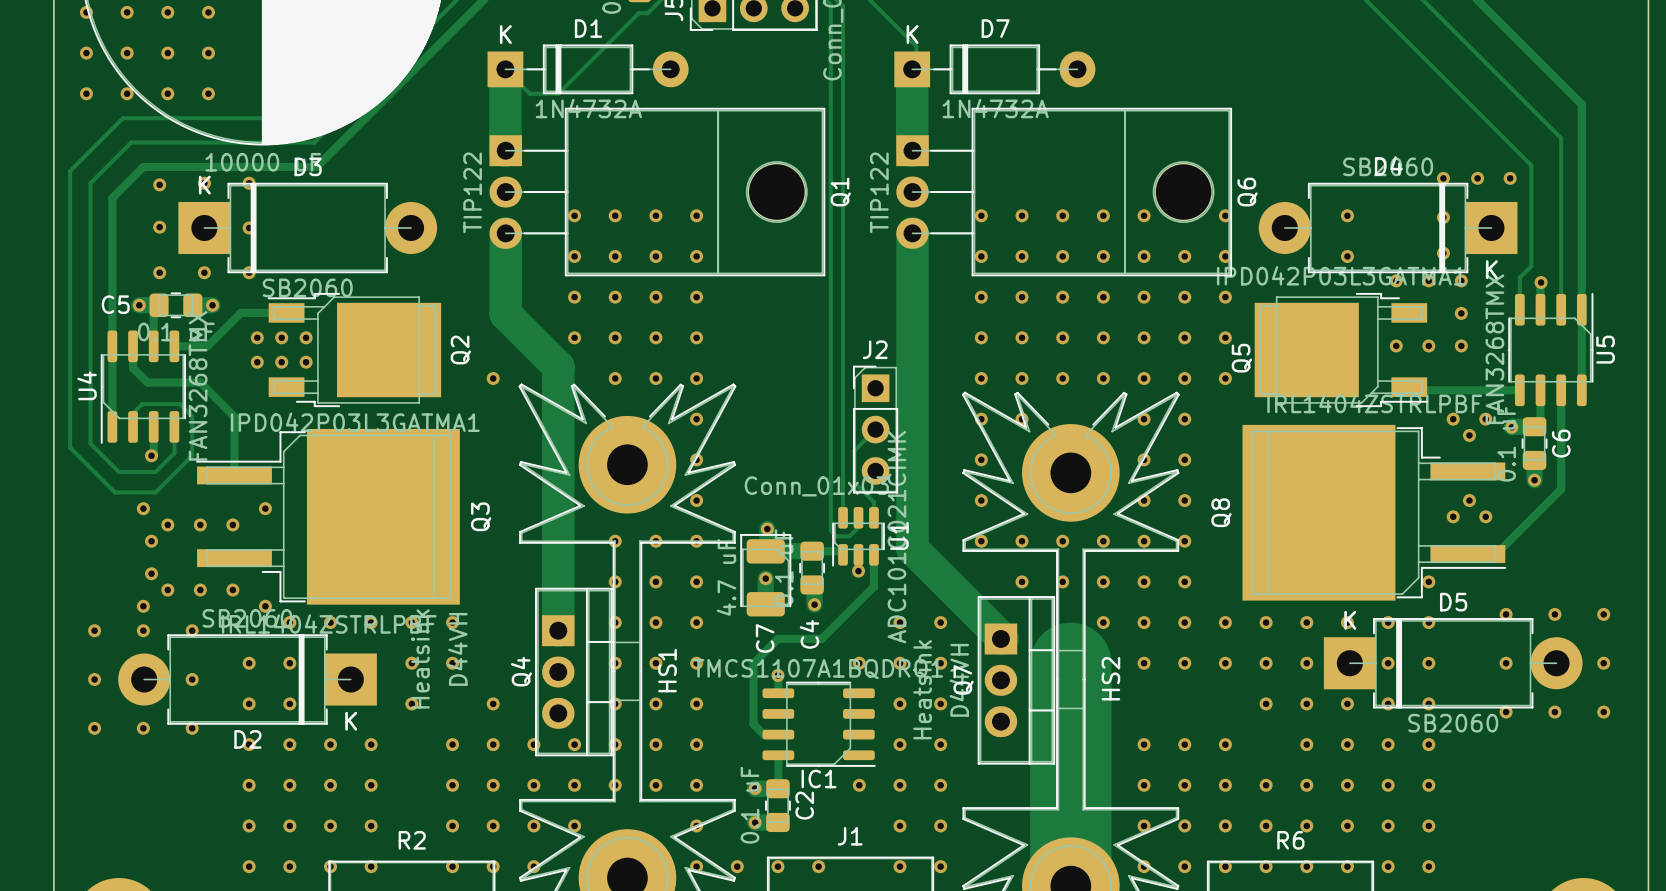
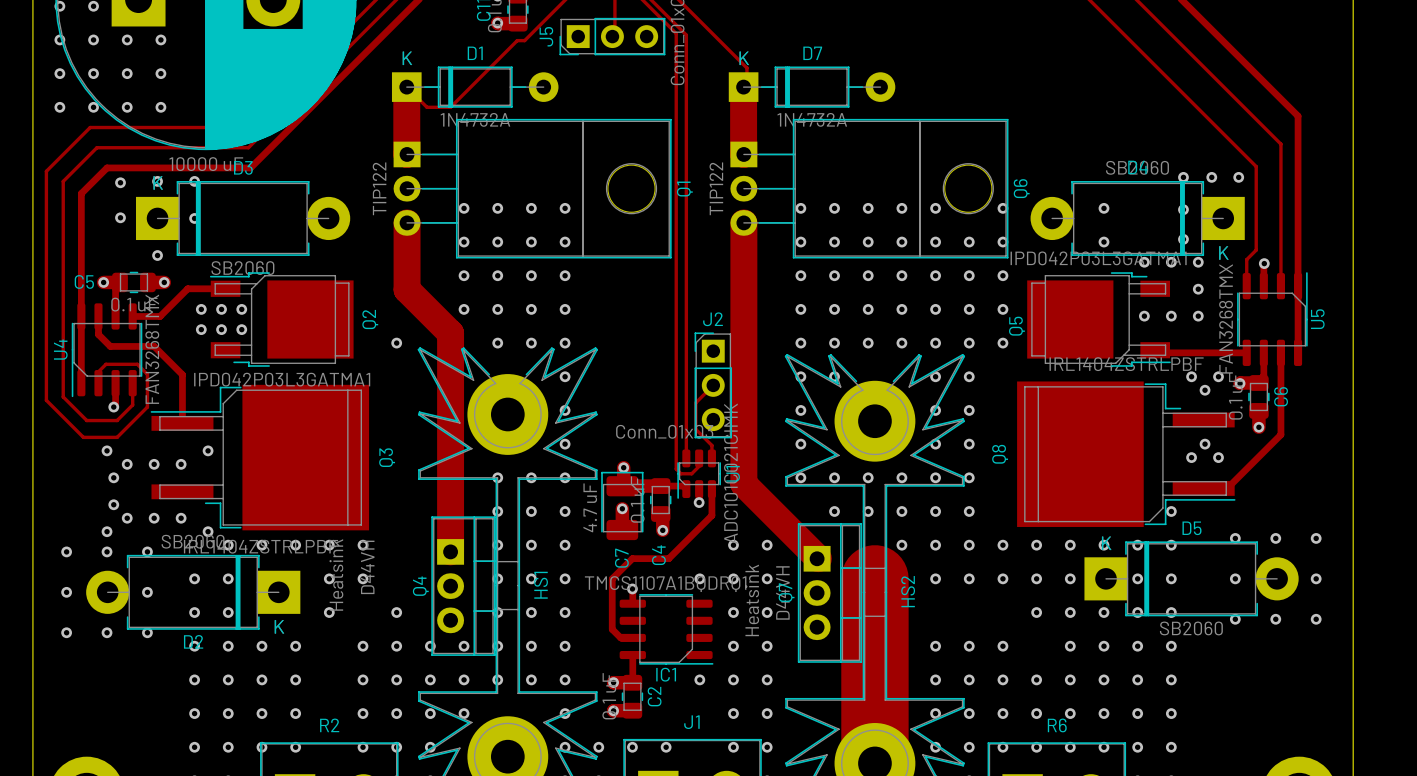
via: (159, 272) -> none
via: (249, 272) -> none

